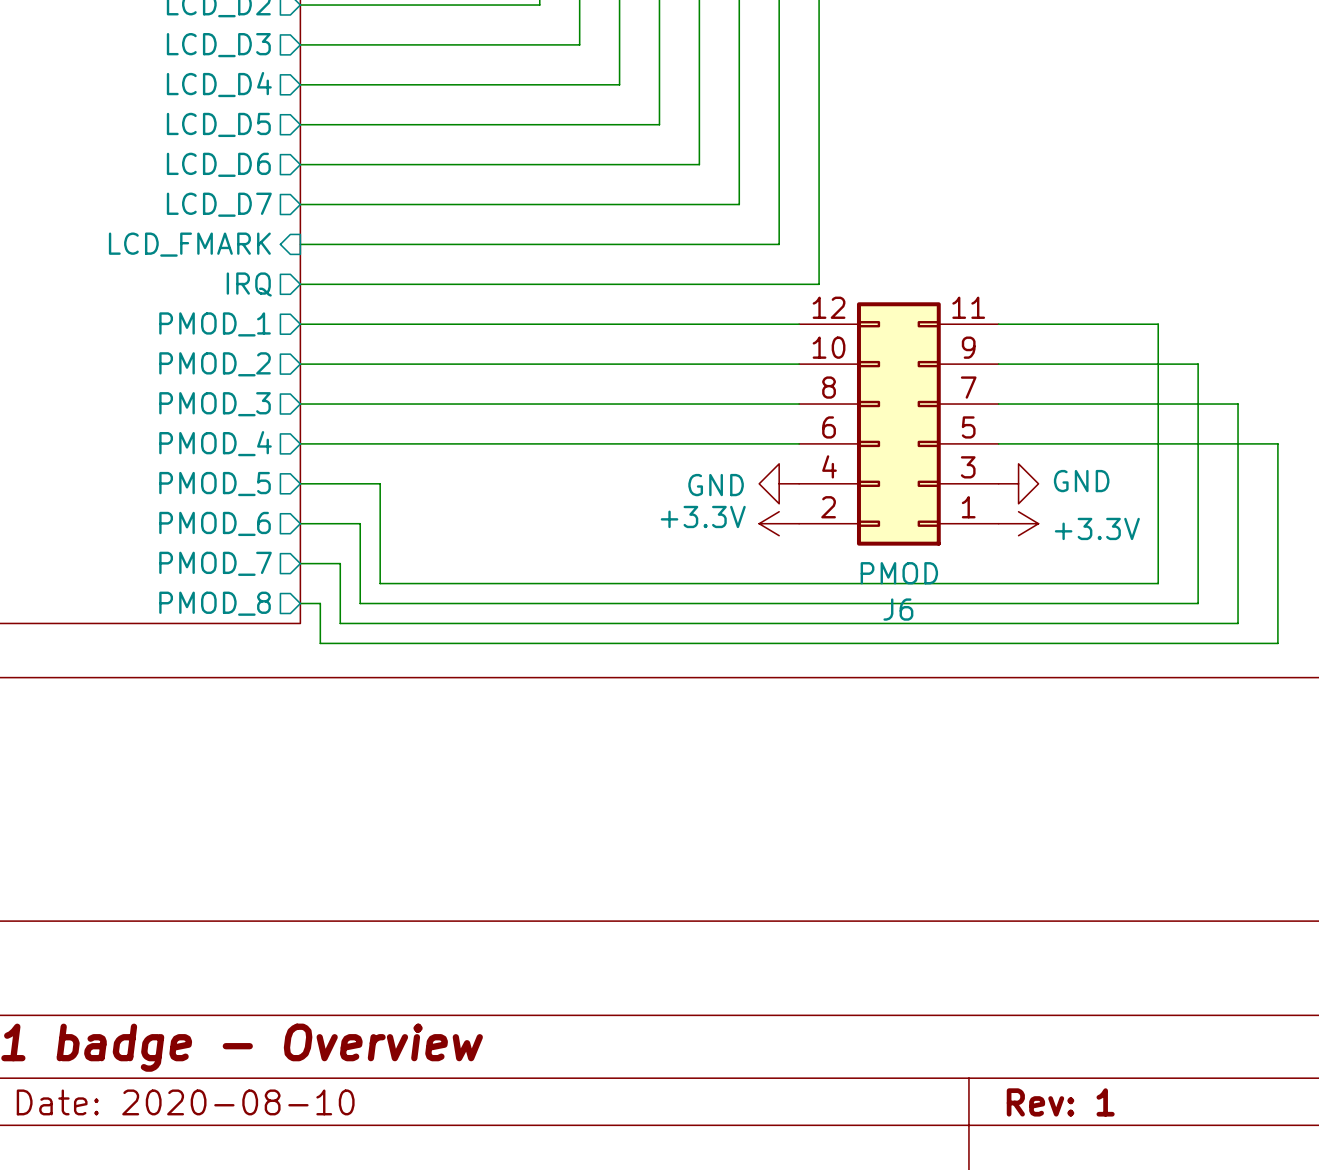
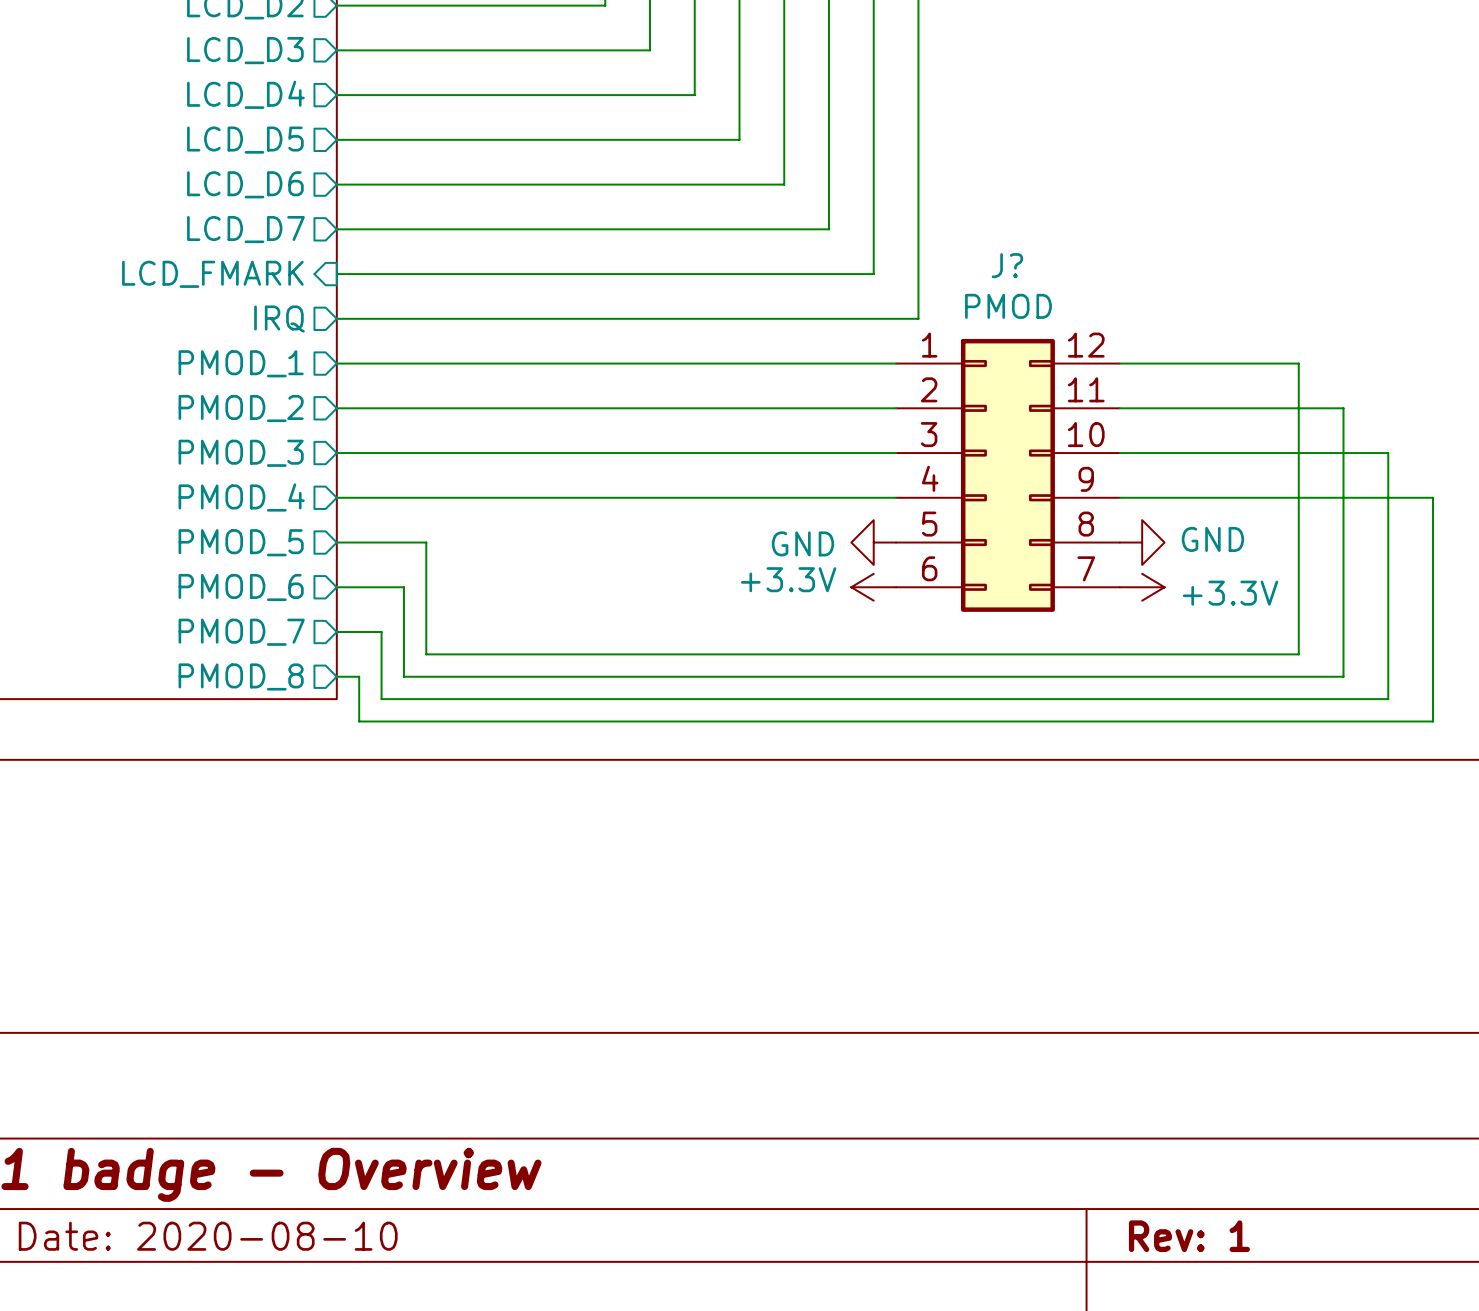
J6 symbol: [799, 302, 999, 546] -> [896, 338, 1120, 612]
J6 value position: PMOD (899, 573) -> PMOD (1008, 306)
J6 name: J6 (898, 609) -> J? (1007, 265)

